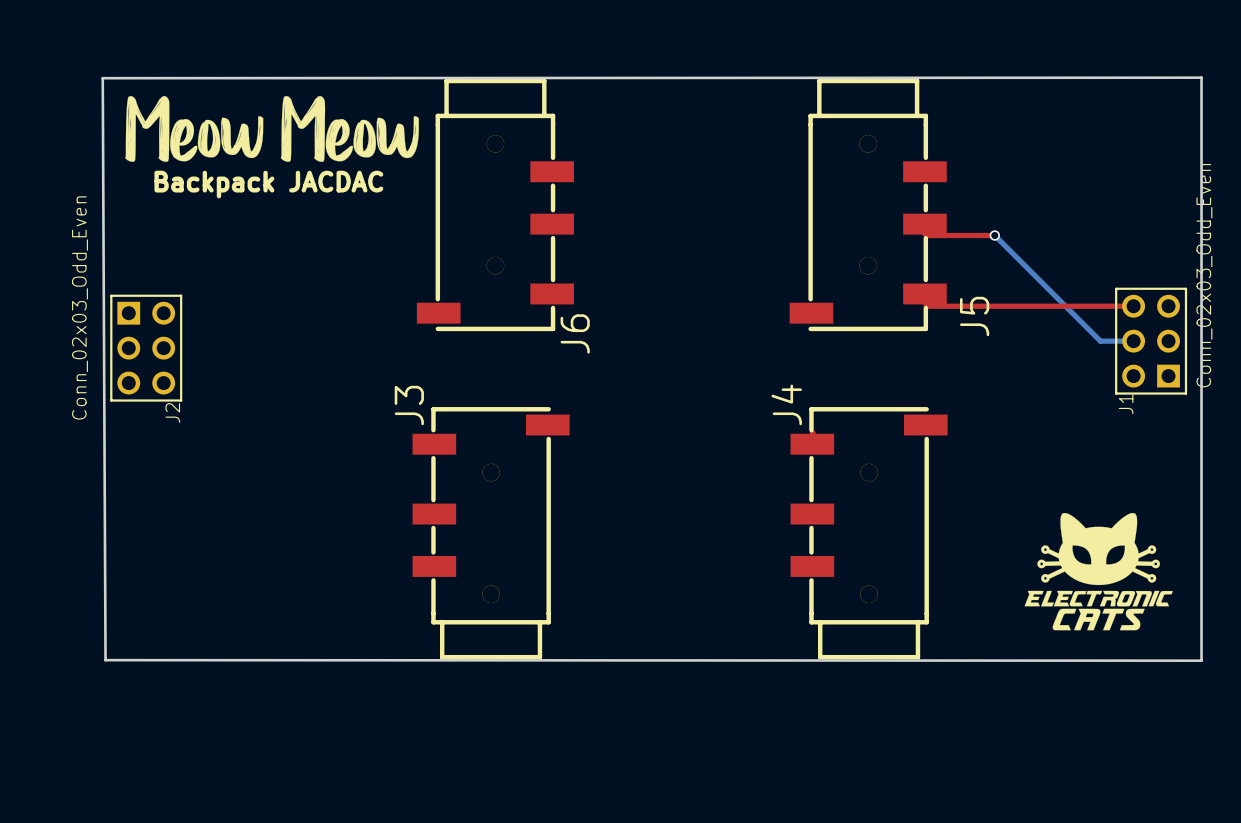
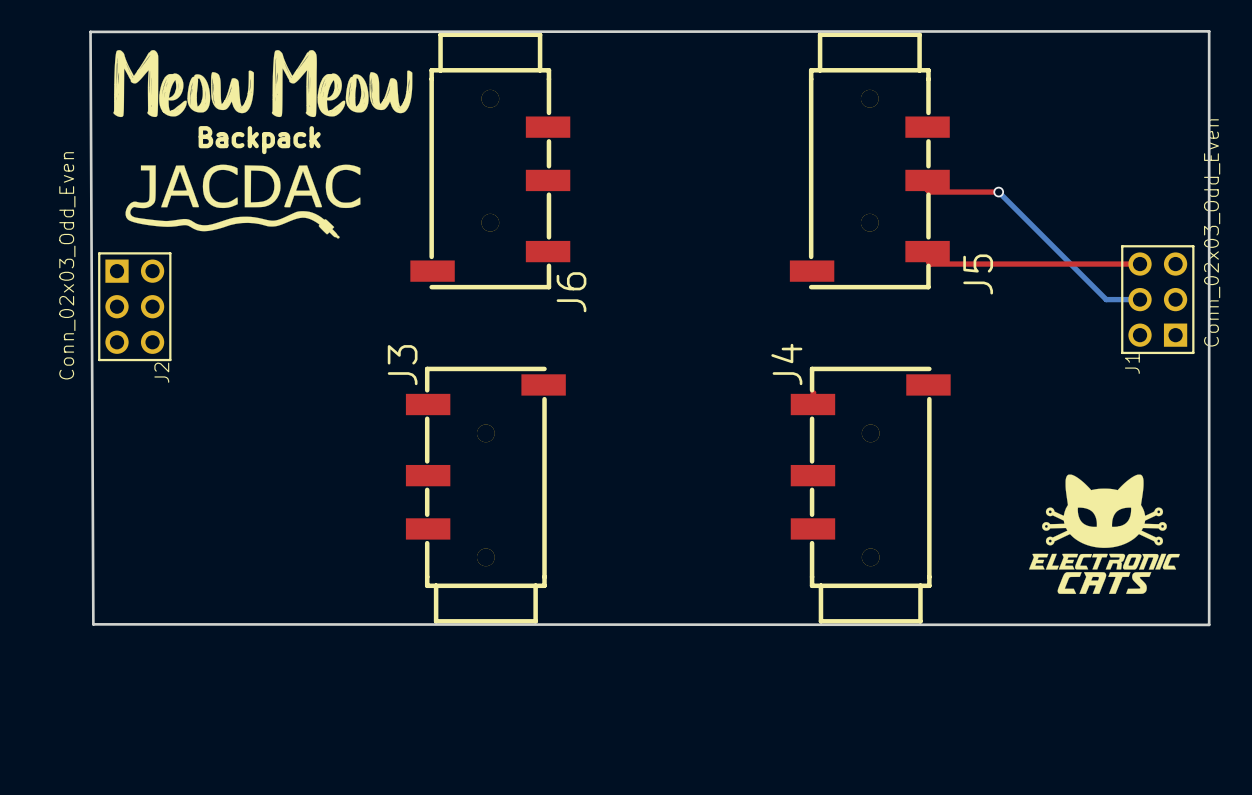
text: Backpack JACDAC (268, 184) -> Backpack (259, 140)
drawing: none -> [125, 164, 361, 239]

